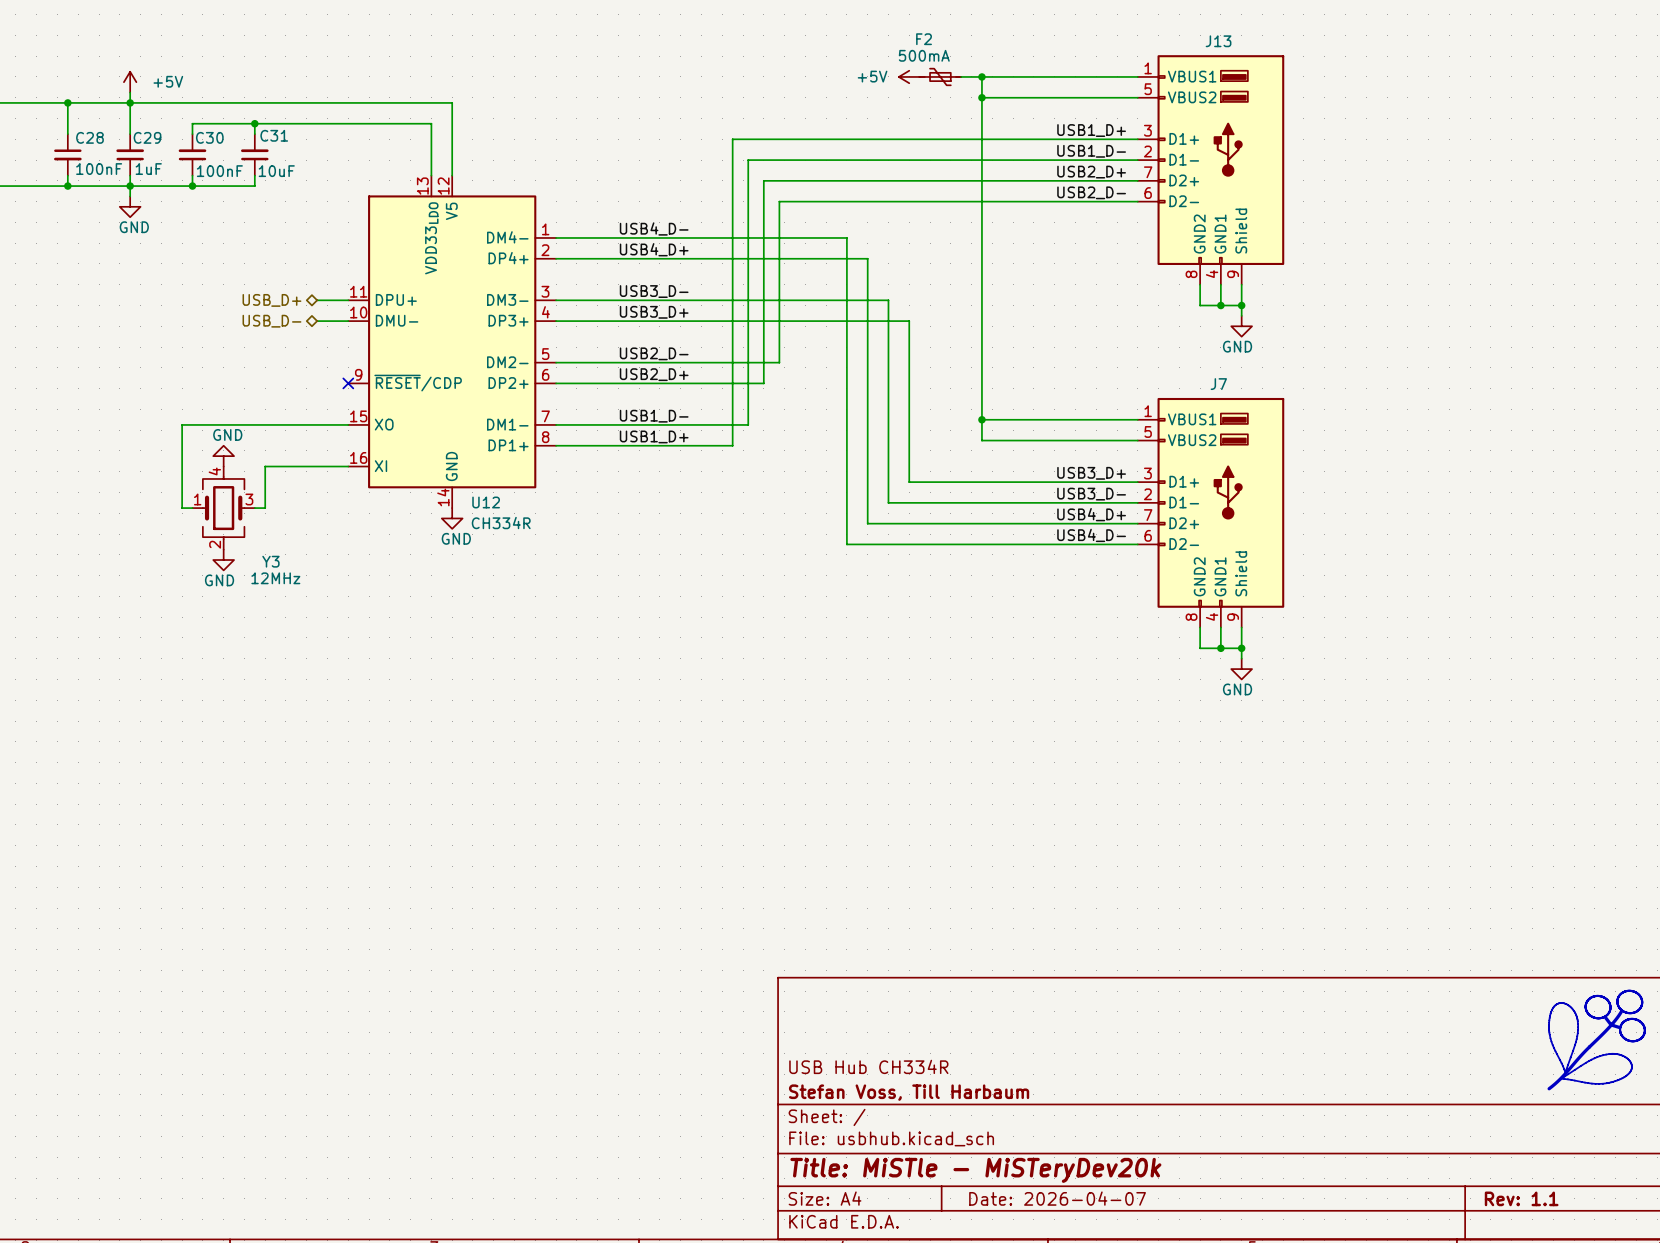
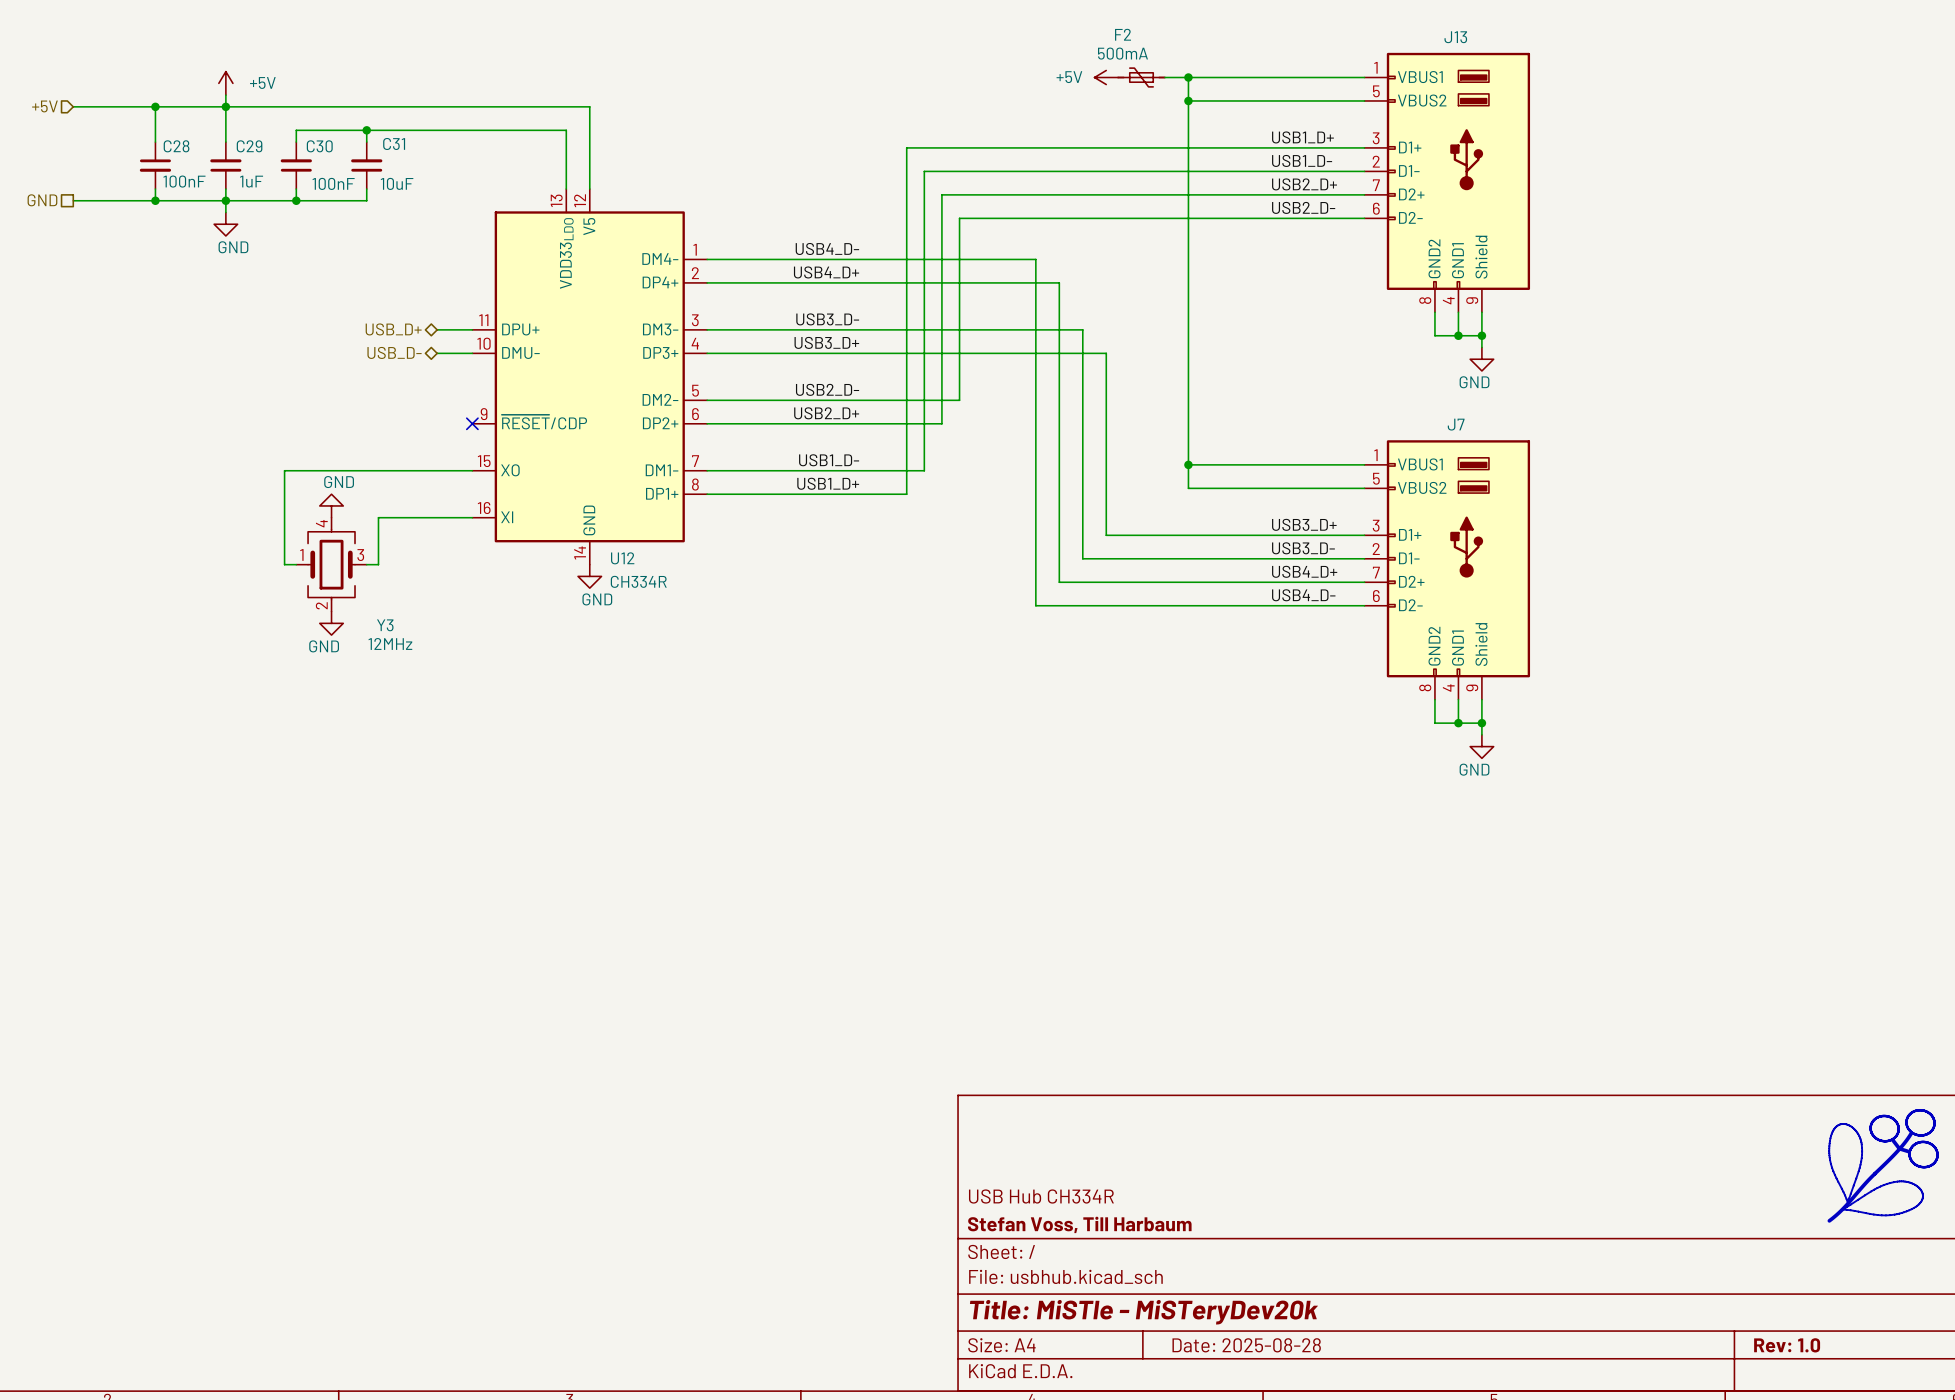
title block: Date: 2026-04-07 (1057, 1198) -> Date: 2025-08-28 (1246, 1345)
title block: Rev: 1.1 (1521, 1198) -> Rev: 1.0 (1787, 1345)

